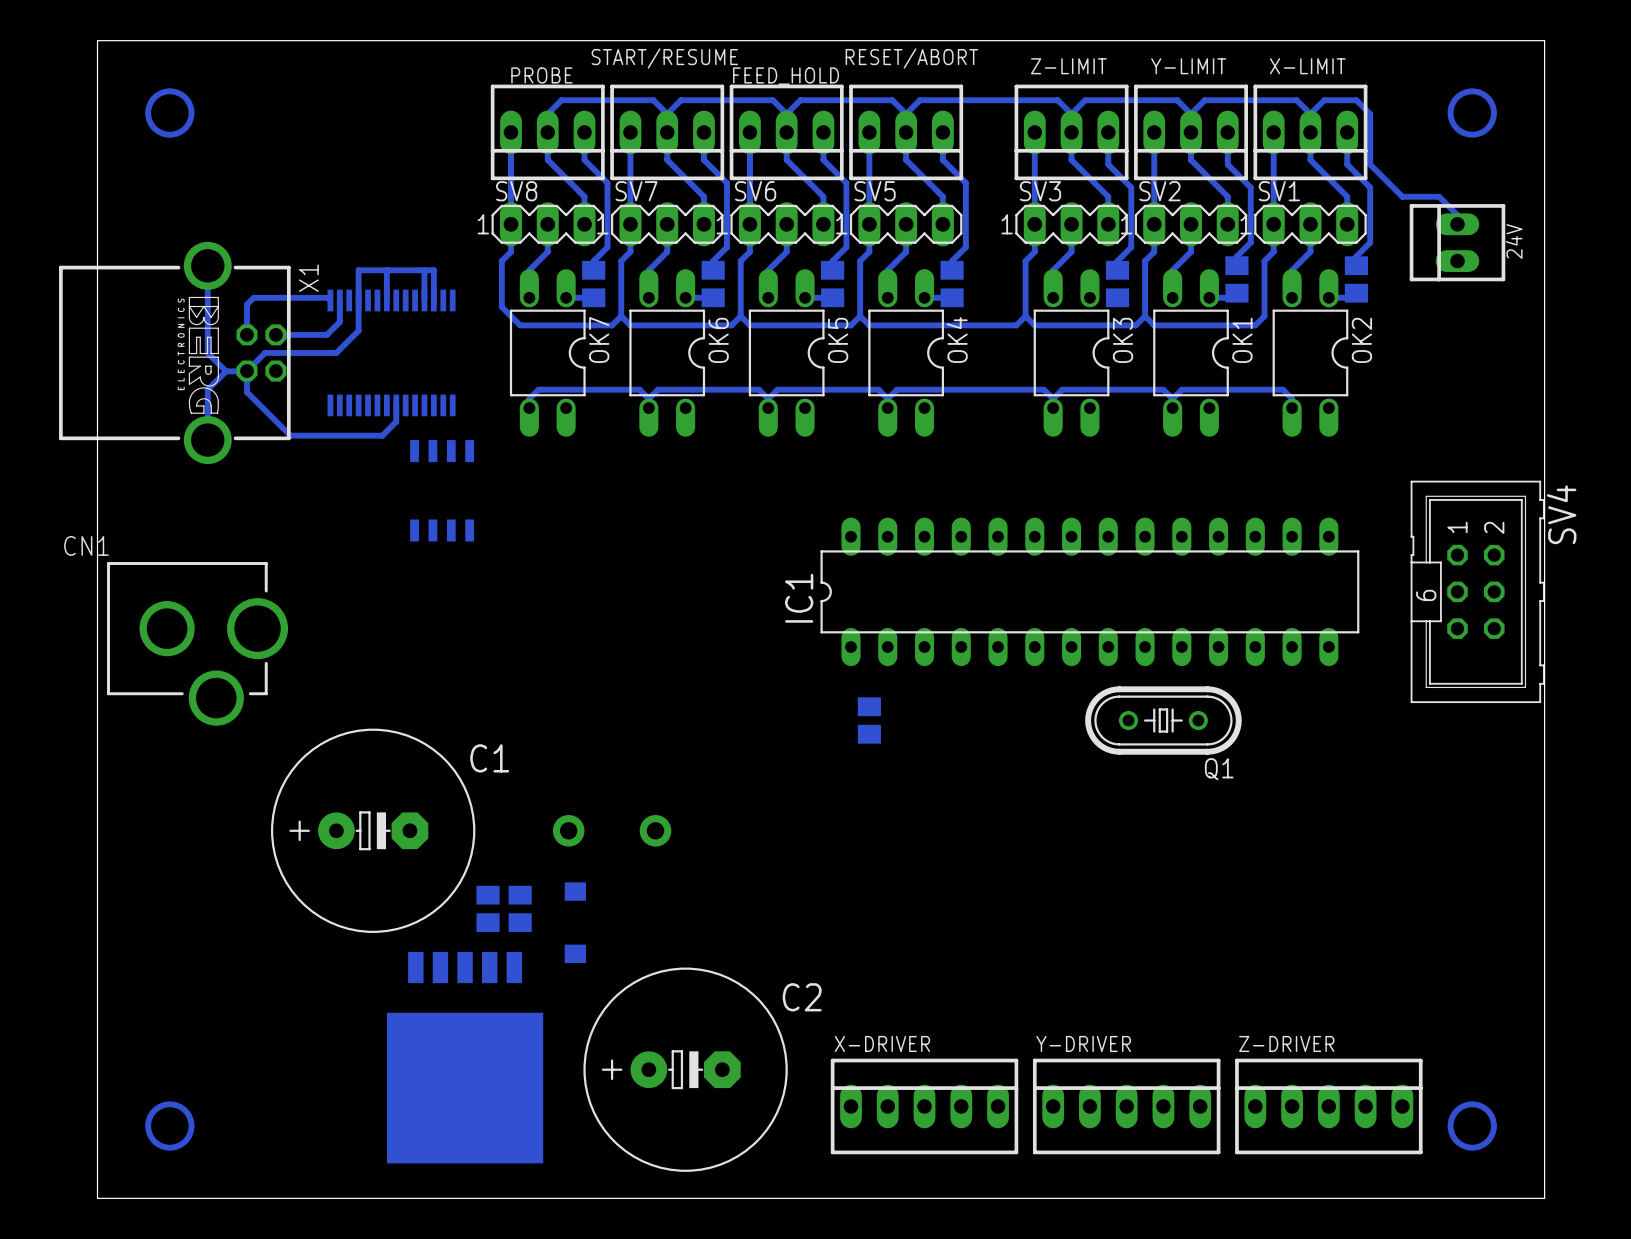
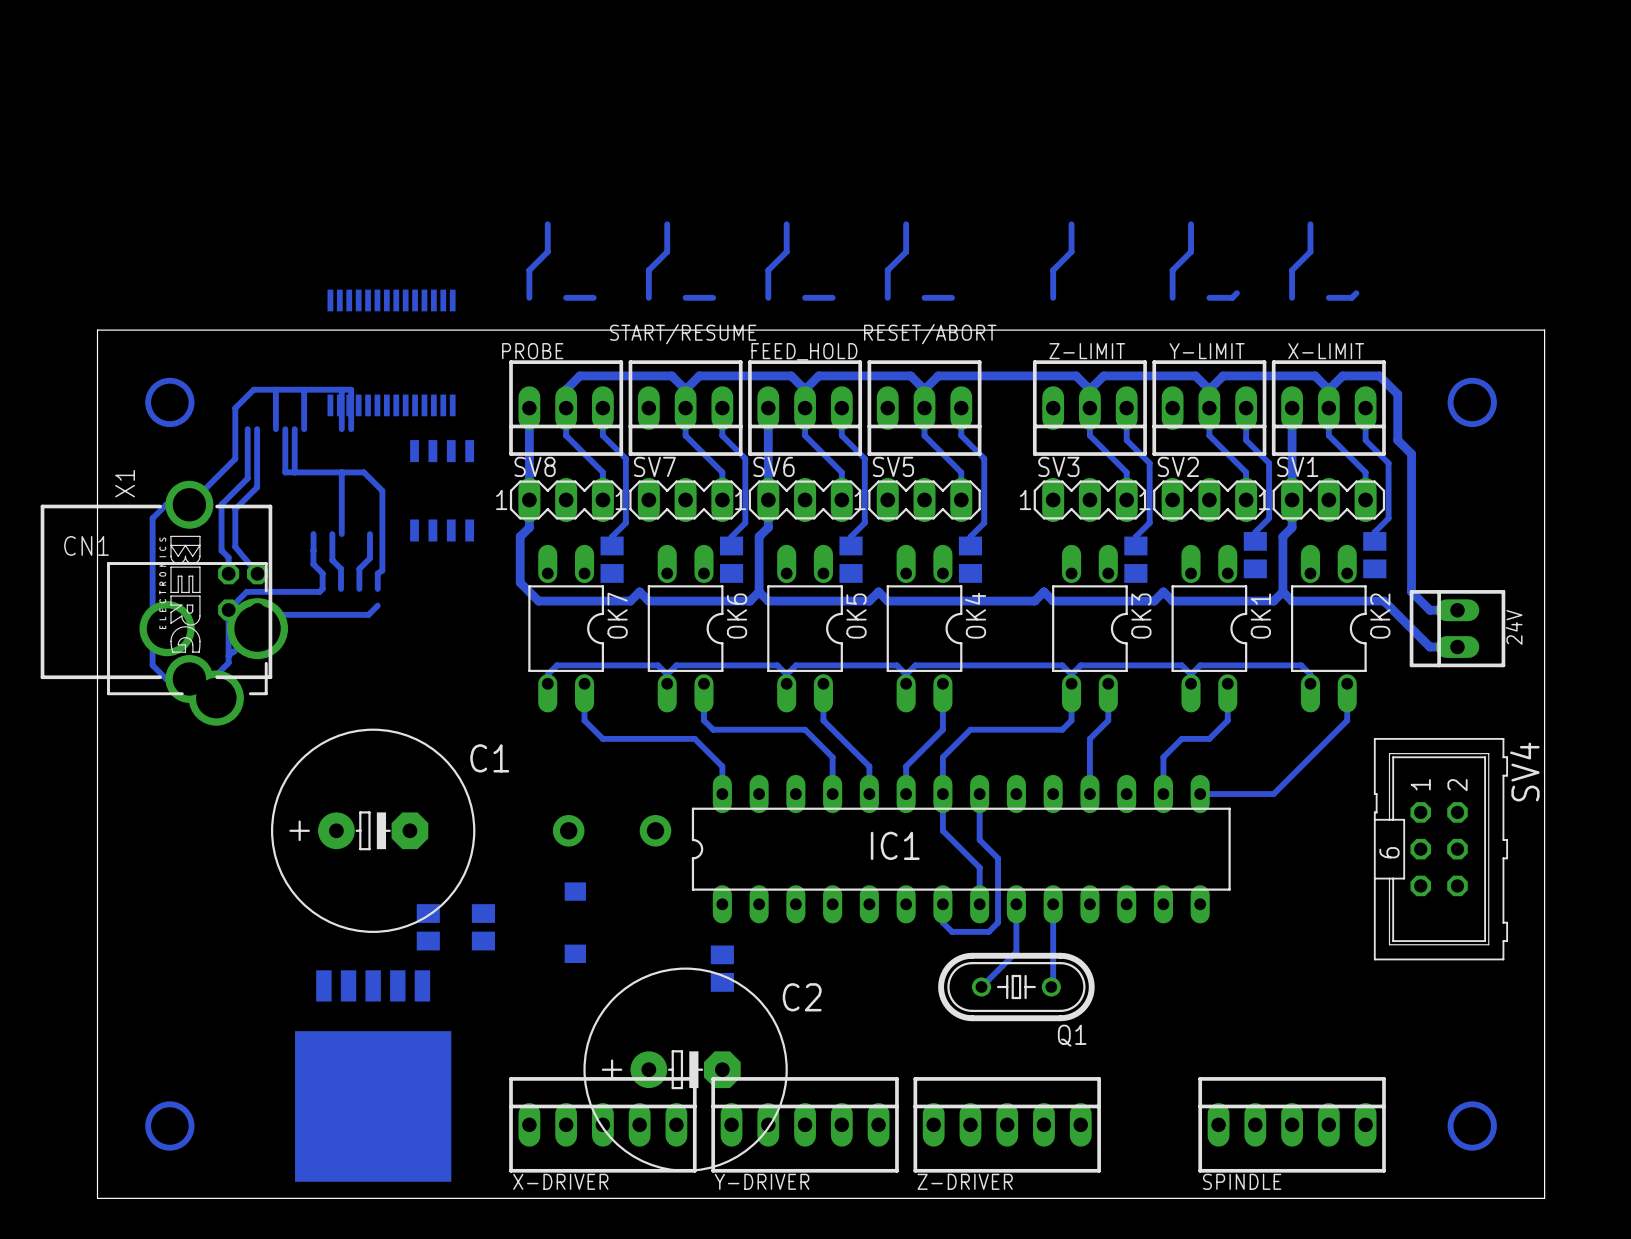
Z-LIMIT name position: Z-LIMIT (1068, 66) -> Z-LIMIT (1087, 351)
Y-LIMIT name position: Y-LIMIT (1188, 66) -> Y-LIMIT (1207, 351)
X-LIMIT name position: X-LIMIT (1307, 66) -> X-LIMIT (1326, 351)
PROBE name position: PROBE (541, 75) -> PROBE (532, 351)
drawing position: (169, 113) -> (169, 402)
drawing position: (1472, 113) -> (1472, 402)
bottom track: (667, 114) (681, 100) (772, 100) (786, 114) -> (685, 389) (699, 375) (791, 375) (805, 389)
bottom track: (667, 114) (667, 159) (703, 196) (703, 224) -> none
bottom track: (667, 114) (653, 100) (561, 100) (547, 114) (547, 159) (584, 196) (584, 224) -> none
bottom track: (786, 114) (800, 100) (892, 100) (906, 114) -> (805, 389) (818, 375) (910, 375) (924, 389)
bottom track: (786, 114) (786, 159) (823, 196) (823, 224) -> none
bottom track: (906, 114) (919, 100) (1057, 100) (1071, 114) -> (924, 389) (938, 375) (1076, 375) (1089, 389)
bottom track: (906, 114) (906, 159) (942, 196) (942, 224) -> none
bottom track: (1071, 114) (1085, 100) (1177, 100) (1191, 114) -> (1089, 389) (1103, 375) (1195, 375) (1209, 389)
bottom track: (1071, 114) (1071, 159) (1108, 196) (1108, 224) -> none
bottom track: (1191, 114) (1204, 100) (1296, 100) (1310, 114) -> (1209, 389) (1223, 375) (1315, 375) (1328, 389)
bottom track: (1191, 114) (1191, 159) (1227, 196) (1227, 224) -> none
bottom track: (1310, 114) (1310, 159) (1347, 196) (1347, 224) -> (1328, 389) (1328, 435) (1365, 472) (1365, 499)
bottom track: (1310, 114) (1324, 100) (1356, 100) (1370, 114) (1370, 164) (1402, 196) (1439, 196) (1457, 215) (1457, 224) -> none
bottom track: (511, 132) (511, 251) (501, 261) (501, 307) (520, 325) (612, 325) (621, 316) -> none
PROBE position: (547, 132) -> (566, 408)
bottom track: (584, 132) (584, 159) (607, 182) (607, 247) (593, 261) (593, 270) -> (602, 408) (602, 435) (625, 458) (625, 522) (612, 536) (612, 545)
bottom track: (630, 132) (630, 251) (621, 261) (621, 316) -> none
START/RESUME position: (667, 132) -> (685, 408)
bottom track: (703, 132) (703, 159) (726, 182) (726, 247) (713, 261) (713, 270) -> (722, 408) (722, 435) (745, 458) (745, 522) (731, 536) (731, 545)
bottom track: (749, 132) (749, 251) (740, 261) (740, 316) -> none
FEED_HOLD position: (786, 132) -> (805, 408)
bottom track: (823, 132) (823, 159) (846, 182) (846, 247) (832, 261) (832, 270) -> (841, 408) (841, 435) (864, 458) (864, 522) (851, 536) (851, 545)
bottom track: (869, 132) (869, 251) (860, 261) (860, 316) -> none
RESET/ABORT position: (906, 132) -> (924, 408)
bottom track: (942, 132) (942, 159) (965, 182) (965, 247) (952, 261) (952, 270) -> (961, 408) (961, 435) (984, 458) (984, 522) (970, 536) (970, 545)
bottom track: (1034, 132) (1034, 251) (1025, 261) (1025, 316) -> none
Z-LIMIT position: (1071, 132) -> (1089, 408)
bottom track: (1108, 132) (1108, 164) (1131, 187) (1131, 247) (1117, 261) (1117, 270) -> (1126, 408) (1126, 440) (1149, 463) (1149, 522) (1135, 536) (1135, 545)
bottom track: (1154, 132) (1154, 251) (1145, 261) (1145, 316) -> none
Y-LIMIT position: (1191, 132) -> (1209, 408)
bottom track: (1227, 132) (1227, 164) (1250, 187) (1250, 242) (1236, 256) (1236, 265) -> (1246, 408) (1246, 440) (1269, 463) (1269, 518) (1255, 532) (1255, 541)
bottom track: (1273, 132) (1273, 251) (1264, 261) (1264, 316) (1255, 325) (1154, 325) (1145, 316) -> none
X-LIMIT position: (1310, 132) -> (1328, 408)
bottom track: (1347, 132) (1347, 164) (1370, 187) (1370, 242) (1356, 256) (1356, 265) -> (1365, 408) (1365, 440) (1388, 463) (1388, 518) (1374, 532) (1374, 541)
SV8 position: (547, 224) -> (566, 499)
SV7 position: (667, 224) -> (685, 499)
SV6 position: (786, 224) -> (805, 499)
SV5 position: (906, 224) -> (924, 499)
SV3 position: (1071, 224) -> (1089, 499)
SV2 position: (1191, 224) -> (1209, 499)
SV1 position: (1310, 224) -> (1328, 499)
24V position: (1457, 242) -> (1457, 628)
bottom track: (207, 265) (207, 352) (226, 371) -> none
bottom track: (386, 270) (386, 300) -> none
bottom track: (424, 270) (424, 300) -> none
X1 name position: X1 (308, 278) -> X1 (125, 483)
part: (1236, 279) -> none
part: (1356, 279) -> none
part: (593, 284) -> none
part: (713, 284) -> none
part: (832, 284) -> none
part: (952, 284) -> none
part: (1117, 284) -> none
bottom track: (330, 300) (327, 297) (253, 297) (246, 304) (246, 334) -> none
bottom track: (339, 300) (339, 321) (326, 334) (275, 334) -> none
bottom track: (433, 300) (433, 270) (358, 270) (358, 330) (336, 352) (265, 352) (246, 371) (226, 371) -> none
bottom track: (621, 316) (630, 325) (731, 325) (740, 316) -> none
bottom track: (740, 316) (749, 325) (851, 325) (860, 316) -> none
bottom track: (860, 316) (869, 325) (1016, 325) (1025, 316) -> none
bottom track: (1025, 316) (1034, 325) (1135, 325) (1145, 316) -> none
board edge: (97, 330) (97, 40) (1544, 40) (1544, 330) -> (97, 330) (1544, 330)
X1 position: (174, 352) -> (156, 591)
OK7 position: (547, 352) -> (566, 628)
OK6 position: (667, 352) -> (685, 628)
OK5 position: (786, 352) -> (805, 628)
OK4 position: (906, 352) -> (924, 628)
OK3 position: (1071, 352) -> (1089, 628)
OK1 position: (1191, 352) -> (1209, 628)
OK2 position: (1310, 352) -> (1328, 628)
bottom track: (226, 371) (207, 389) (207, 440) -> none
bottom track: (246, 371) (246, 392) (290, 435) (382, 435) (396, 421) (396, 405) -> none
bottom track: none -> (275, 389) (275, 429)
bottom track: none -> (304, 389) (304, 429)
bottom track: none -> (341, 389) (341, 429)
bottom track: none -> (685, 389) (685, 435) (722, 472) (722, 499)
bottom track: none -> (685, 389) (671, 375) (579, 375) (566, 389) (566, 435) (602, 472) (602, 499)
bottom track: none -> (805, 389) (805, 435) (841, 472) (841, 499)
bottom track: none -> (924, 389) (924, 435) (961, 472) (961, 499)
bottom track: none -> (1089, 389) (1089, 435) (1126, 472) (1126, 499)
bottom track: none -> (1209, 389) (1209, 435) (1246, 472) (1246, 499)
bottom track: none -> (1328, 389) (1342, 375) (1379, 375) (1397, 394) (1397, 440) (1411, 454) (1411, 591) (1429, 610) (1457, 610)
bottom track: (768, 398) (777, 389) (878, 389) (887, 398) (896, 389) (1043, 389) (1053, 398) (1062, 389) (1163, 389) (1172, 398) (1181, 389) (1282, 389) (1292, 398) (1292, 408) -> (1282, 591) (1282, 536) (1292, 527) (1292, 408)
bottom track: (768, 398) (759, 389) (658, 389) (648, 398) (639, 389) (538, 389) (529, 398) (529, 408) -> none
bottom track: none -> (247, 429) (247, 478) (221, 504) (221, 550) (228, 557) (228, 573)
bottom track: none -> (257, 429) (257, 487) (235, 509) (235, 546) (257, 573)
bottom track: none -> (285, 429) (285, 472) (363, 472) (382, 490) (382, 570) (377, 573) (377, 588)
bottom track: none -> (294, 429) (294, 472)
bottom track: none -> (351, 429) (351, 389) (253, 389) (235, 408) (235, 458) (189, 504) (166, 504) (152, 518) (152, 665) (166, 679) (189, 679)
bottom track: none -> (341, 472) (341, 534)
bottom track: none -> (529, 499) (529, 408) (529, 527) (520, 536) (520, 582) (538, 601) (630, 601) (639, 591) (648, 601) (749, 601) (759, 591)
bottom track: none -> (768, 499) (768, 408) (768, 527) (759, 536) (759, 591)
bottom track: none -> (313, 534) (313, 550)
bottom track: none -> (332, 534) (332, 560) (341, 568) (341, 588)
bottom track: none -> (369, 534) (369, 558) (359, 568) (359, 588)
bottom track: none -> (313, 550) (313, 564) (322, 573) (322, 588) (319, 591) (246, 591) (228, 609) (228, 662) (212, 679) (189, 679)
part: none -> (1255, 555)
part: none -> (1374, 555)
part: none -> (612, 559)
part: none -> (731, 559)
part: none -> (851, 559)
part: none -> (970, 559)
part: none -> (1135, 559)
bottom track: none -> (759, 591) (768, 601) (869, 601) (878, 591) (887, 601) (1034, 601) (1043, 591) (1053, 601) (1154, 601) (1163, 591) (1172, 601) (1273, 601) (1282, 591)
IC1 position: (1089, 591) -> (961, 849)
bottom track: none -> (1282, 591) (1292, 601) (1383, 601) (1429, 647) (1457, 647)
SV4 position: (1477, 591) -> (1440, 849)
IC1 name rotation: 0° (799, 598) -> 90° clockwise (895, 845)
IC1 name position: IC1 (799, 598) -> IC1 (895, 845)
bottom track: none -> (377, 605) (368, 614) (281, 614) (276, 609) (257, 609) (257, 632) (262, 637) (263, 651)
bottom track: none -> (234, 651) (228, 656)
bottom track: none -> (667, 674) (658, 665) (556, 665) (547, 674) (547, 683)
bottom track: none -> (667, 674) (676, 665) (777, 665) (786, 674)
bottom track: none -> (786, 674) (795, 665) (896, 665) (906, 674)
bottom track: none -> (906, 674) (915, 665) (1062, 665) (1071, 674)
bottom track: none -> (1071, 674) (1071, 720) (1062, 729) (970, 729) (942, 757) (942, 830) (979, 867) (979, 904)
bottom track: none -> (1071, 674) (1080, 665) (1181, 665) (1191, 674)
bottom track: none -> (1191, 674) (1200, 665) (1301, 665) (1310, 674) (1310, 683)
bottom track: none -> (584, 683) (584, 720) (602, 738) (694, 738) (722, 766) (722, 794)
bottom track: none -> (703, 683) (703, 720) (713, 729) (805, 729) (832, 757) (832, 794)
bottom track: none -> (823, 683) (823, 720) (869, 766) (869, 794)
bottom track: none -> (942, 683) (942, 729) (906, 766) (906, 794)
bottom track: none -> (1108, 683) (1108, 720) (1089, 738) (1089, 794)
bottom track: none -> (1227, 683) (1227, 720) (1209, 738) (1181, 738) (1163, 757) (1163, 794)
bottom track: none -> (1347, 683) (1347, 720) (1273, 794) (1200, 794)
part: (869, 720) -> none
Q1 position: (1163, 720) -> (1016, 987)
bottom track: none -> (979, 794) (979, 839) (998, 858) (998, 922) (988, 931) (952, 931) (942, 922) (942, 904)
bottom track: none -> (1016, 904) (1016, 952) (981, 987)
bottom track: none -> (1053, 904) (1053, 985) (1051, 987)
part position: (488, 908) -> (483, 927)
part: (520, 908) -> none
part: none -> (428, 927)
part: none -> (722, 968)
X-DRIVER name position: X-DRIVER (882, 1043) -> X-DRIVER (560, 1181)
Y-DRIVER name position: Y-DRIVER (1083, 1043) -> Y-DRIVER (762, 1181)
Z-DRIVER name position: Z-DRIVER (1286, 1043) -> Z-DRIVER (965, 1181)
part position: (465, 1057) -> (373, 1076)
X-DRIVER position: (924, 1106) -> (602, 1124)
Y-DRIVER position: (1126, 1106) -> (805, 1124)
Z-DRIVER position: (1328, 1106) -> (1007, 1124)
SPINDLE: none -> (1292, 1124)

